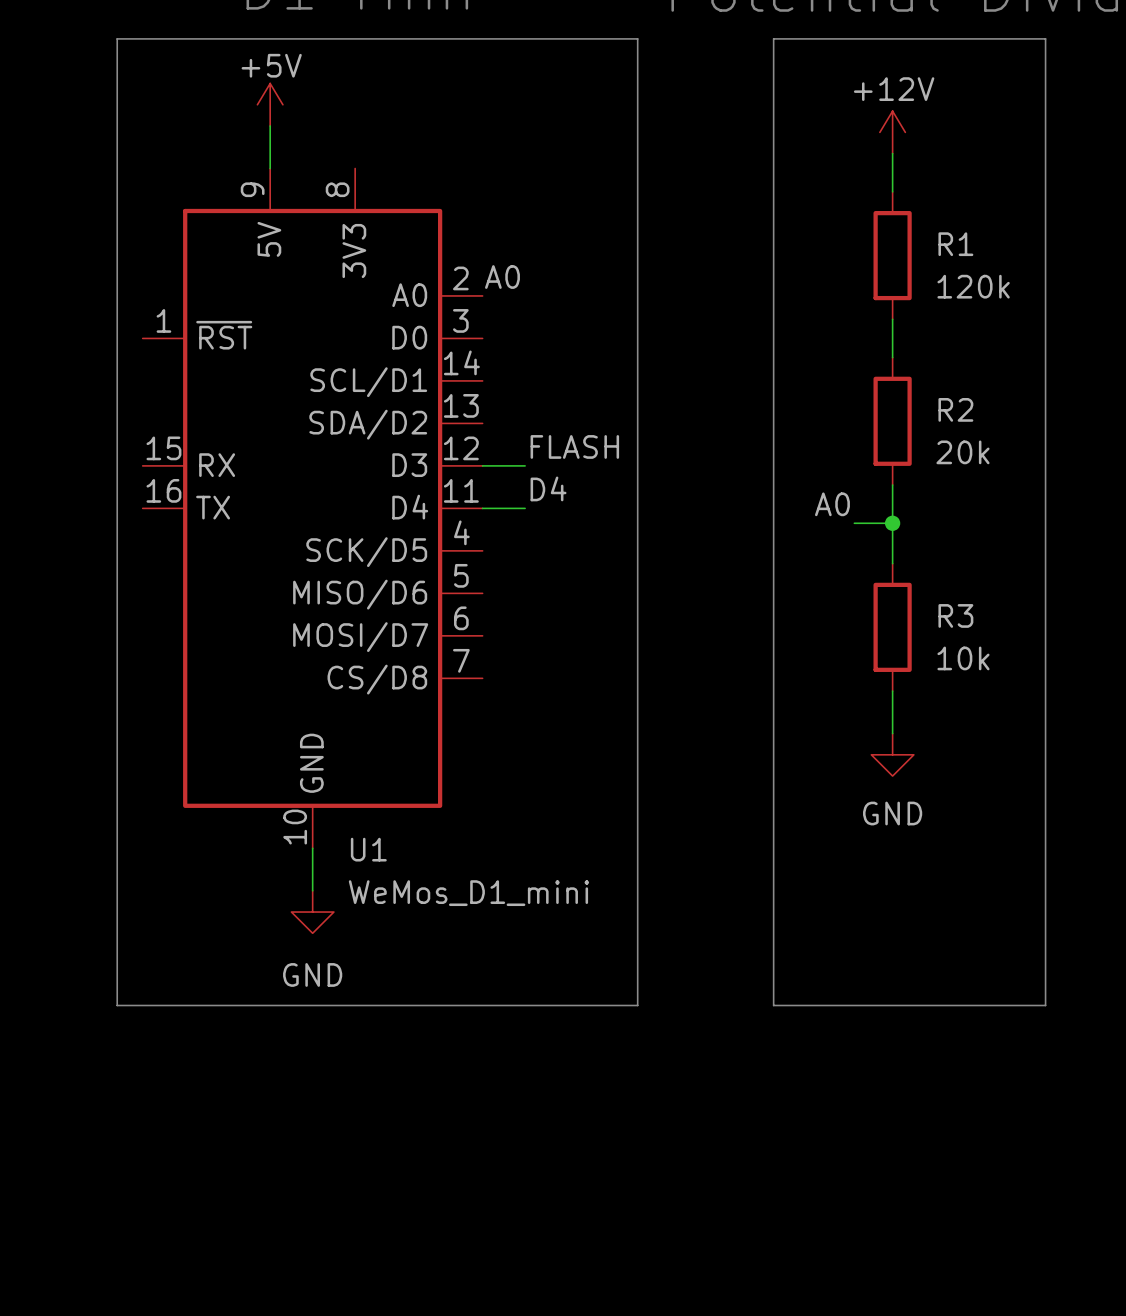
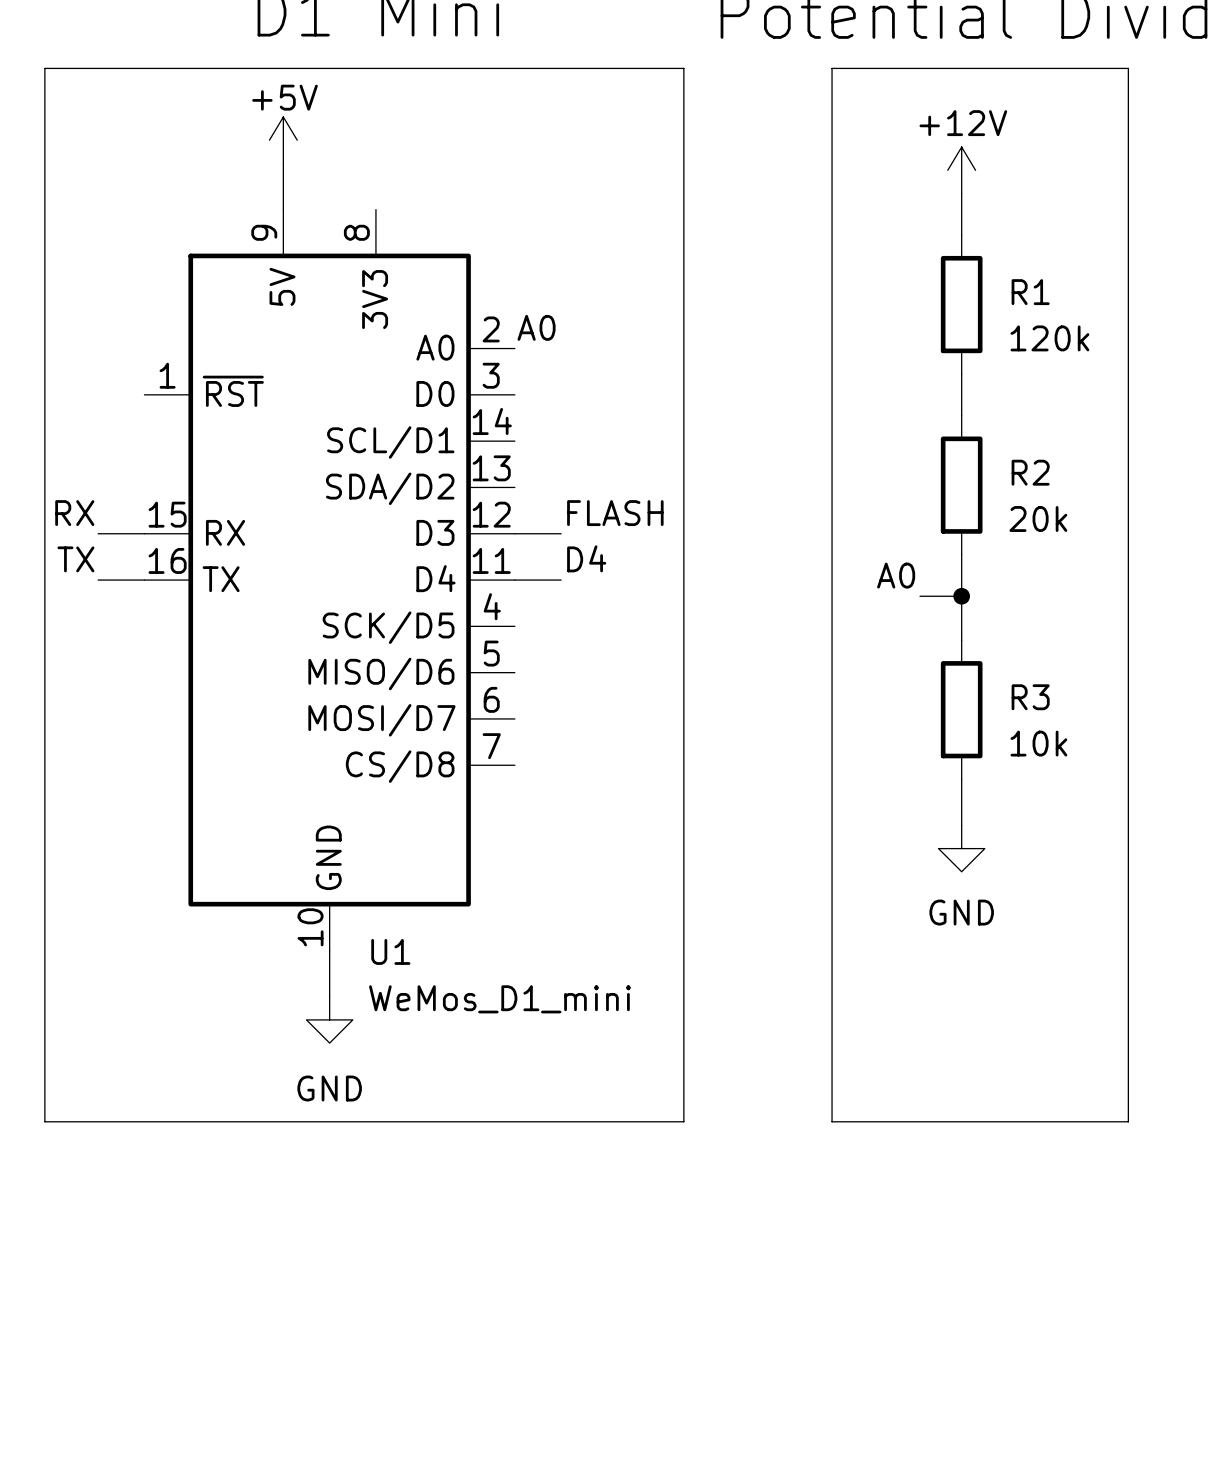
line: (117, 38) (117, 1005) -> (116, 68) (44, 68) (44, 1121) (116, 1121)
label: none -> RX (74, 513)
wire: none -> (98, 533) (144, 533)
label: none -> TX (75, 559)
wire: none -> (98, 580) (144, 580)

